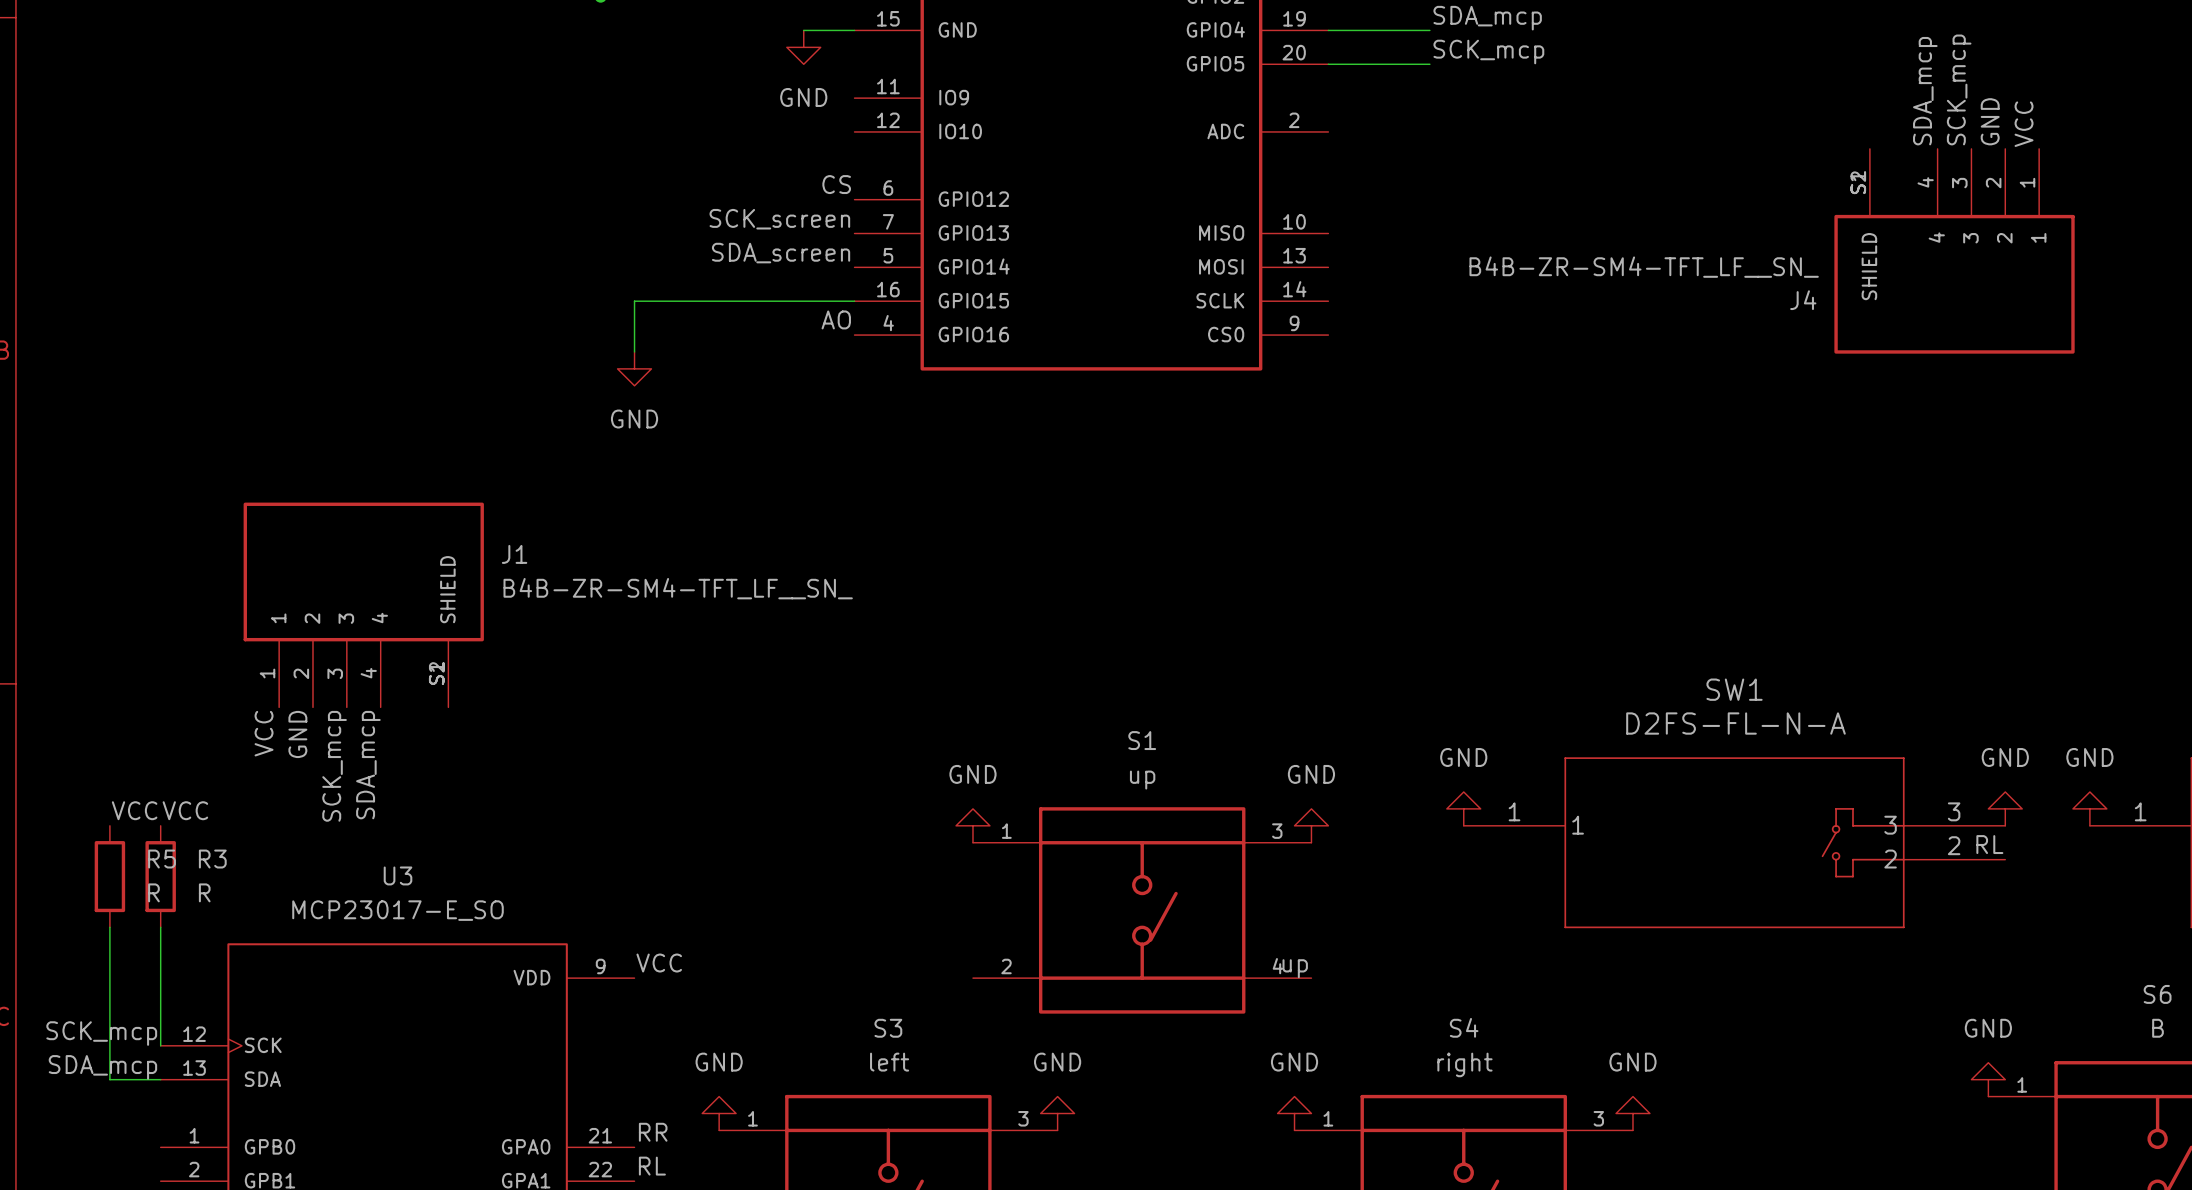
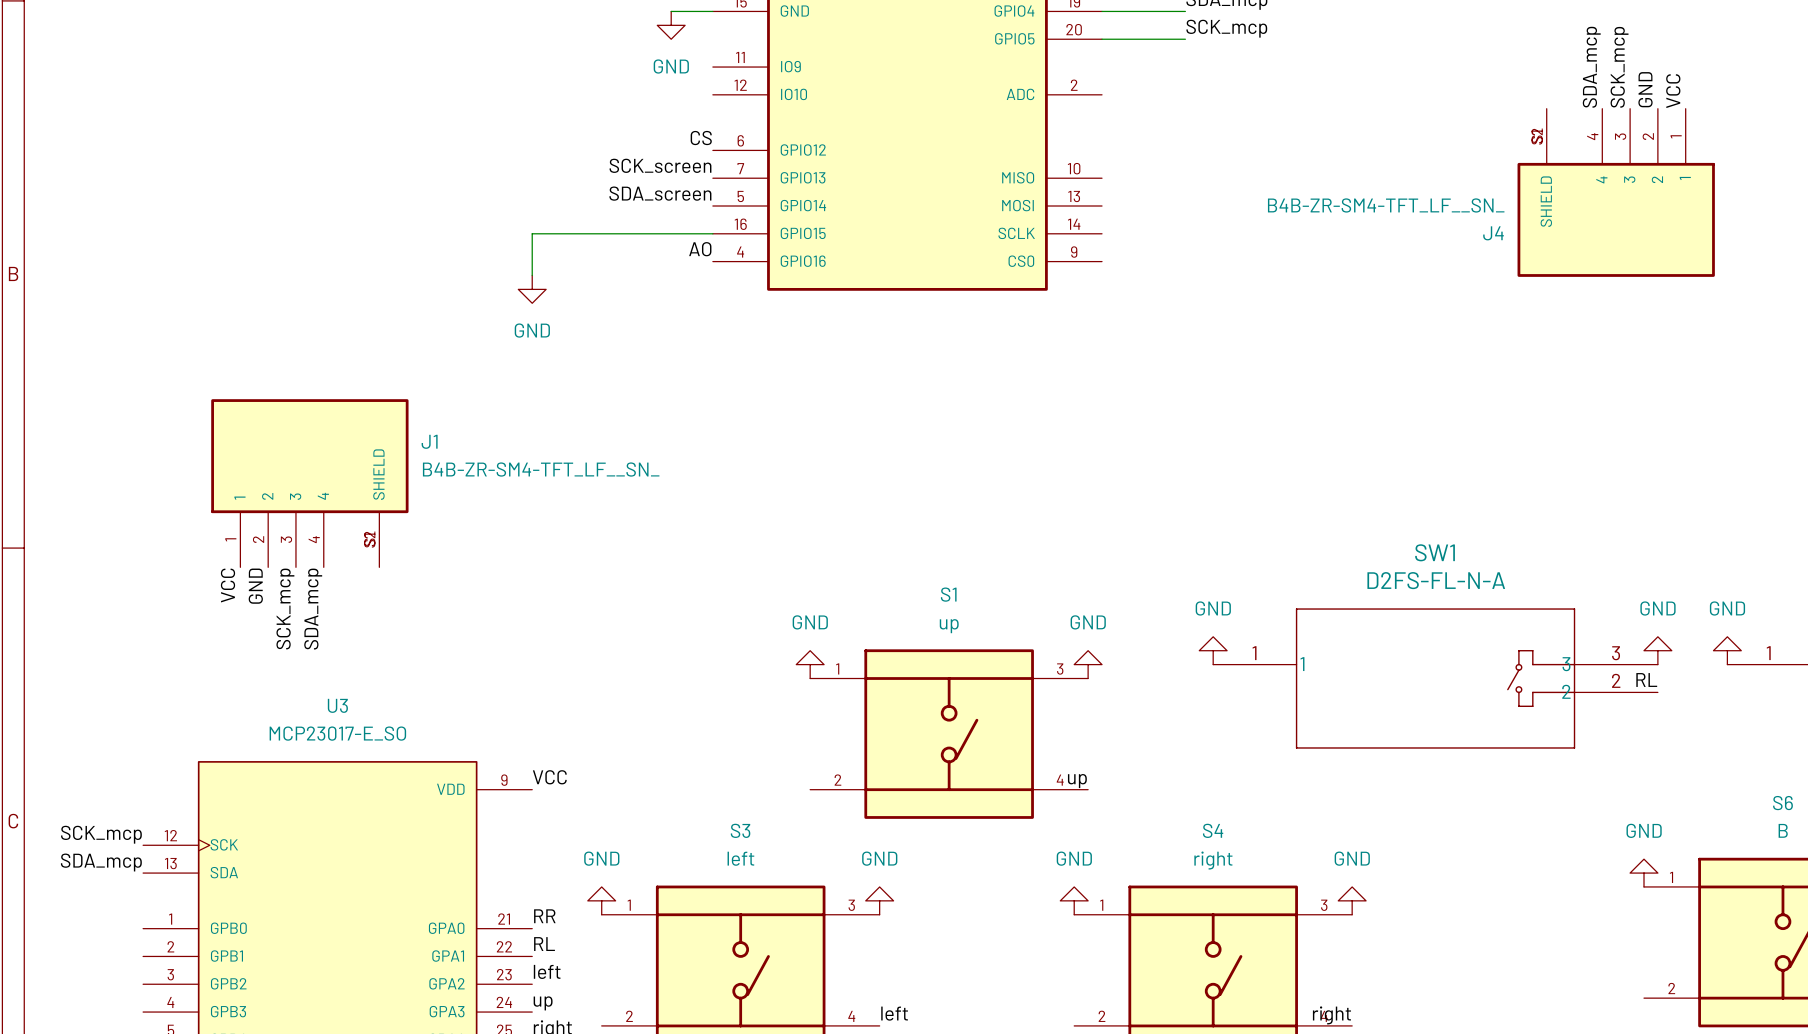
label: VCC (134, 810) -> none
label: VCC (185, 810) -> none
R5: R (109, 876) -> none
R3: R (160, 876) -> none
wire: (109, 927) (109, 1079) (160, 1079) -> none
wire: (160, 927) (160, 1045) -> none

